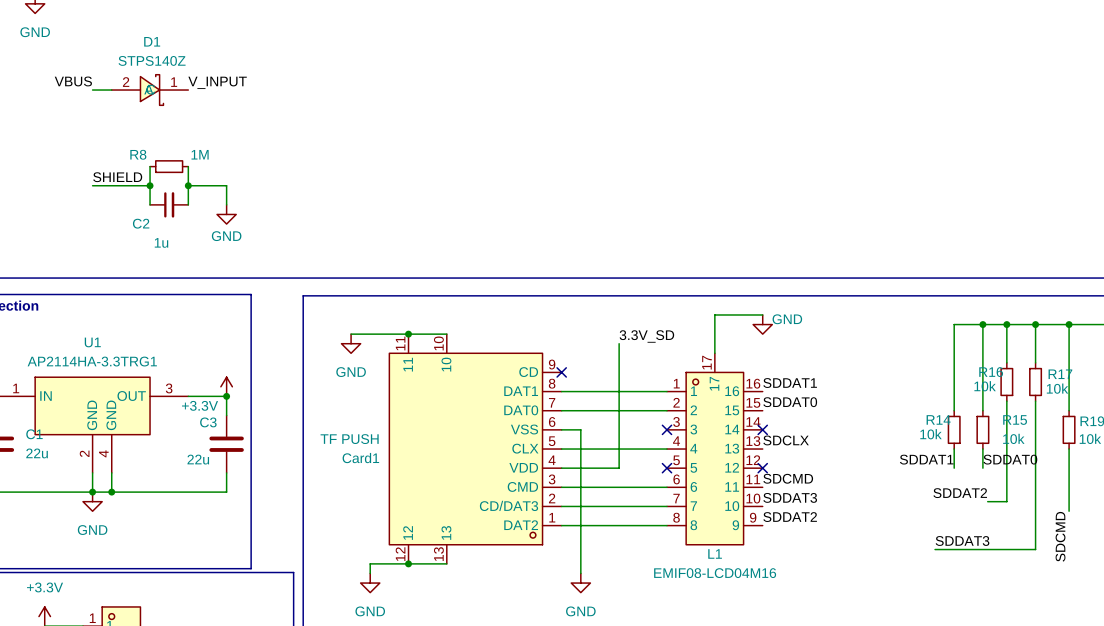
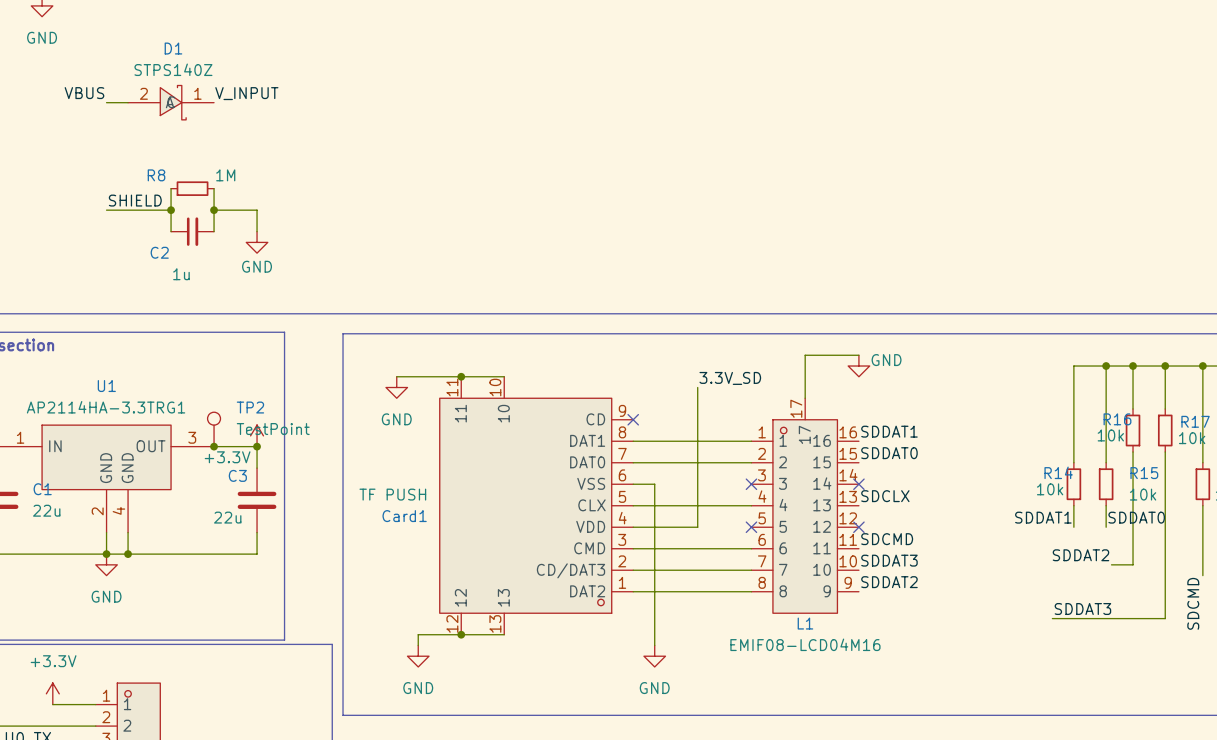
TP2: none -> TestPoint (214, 429)
junction: none -> (214, 446)

